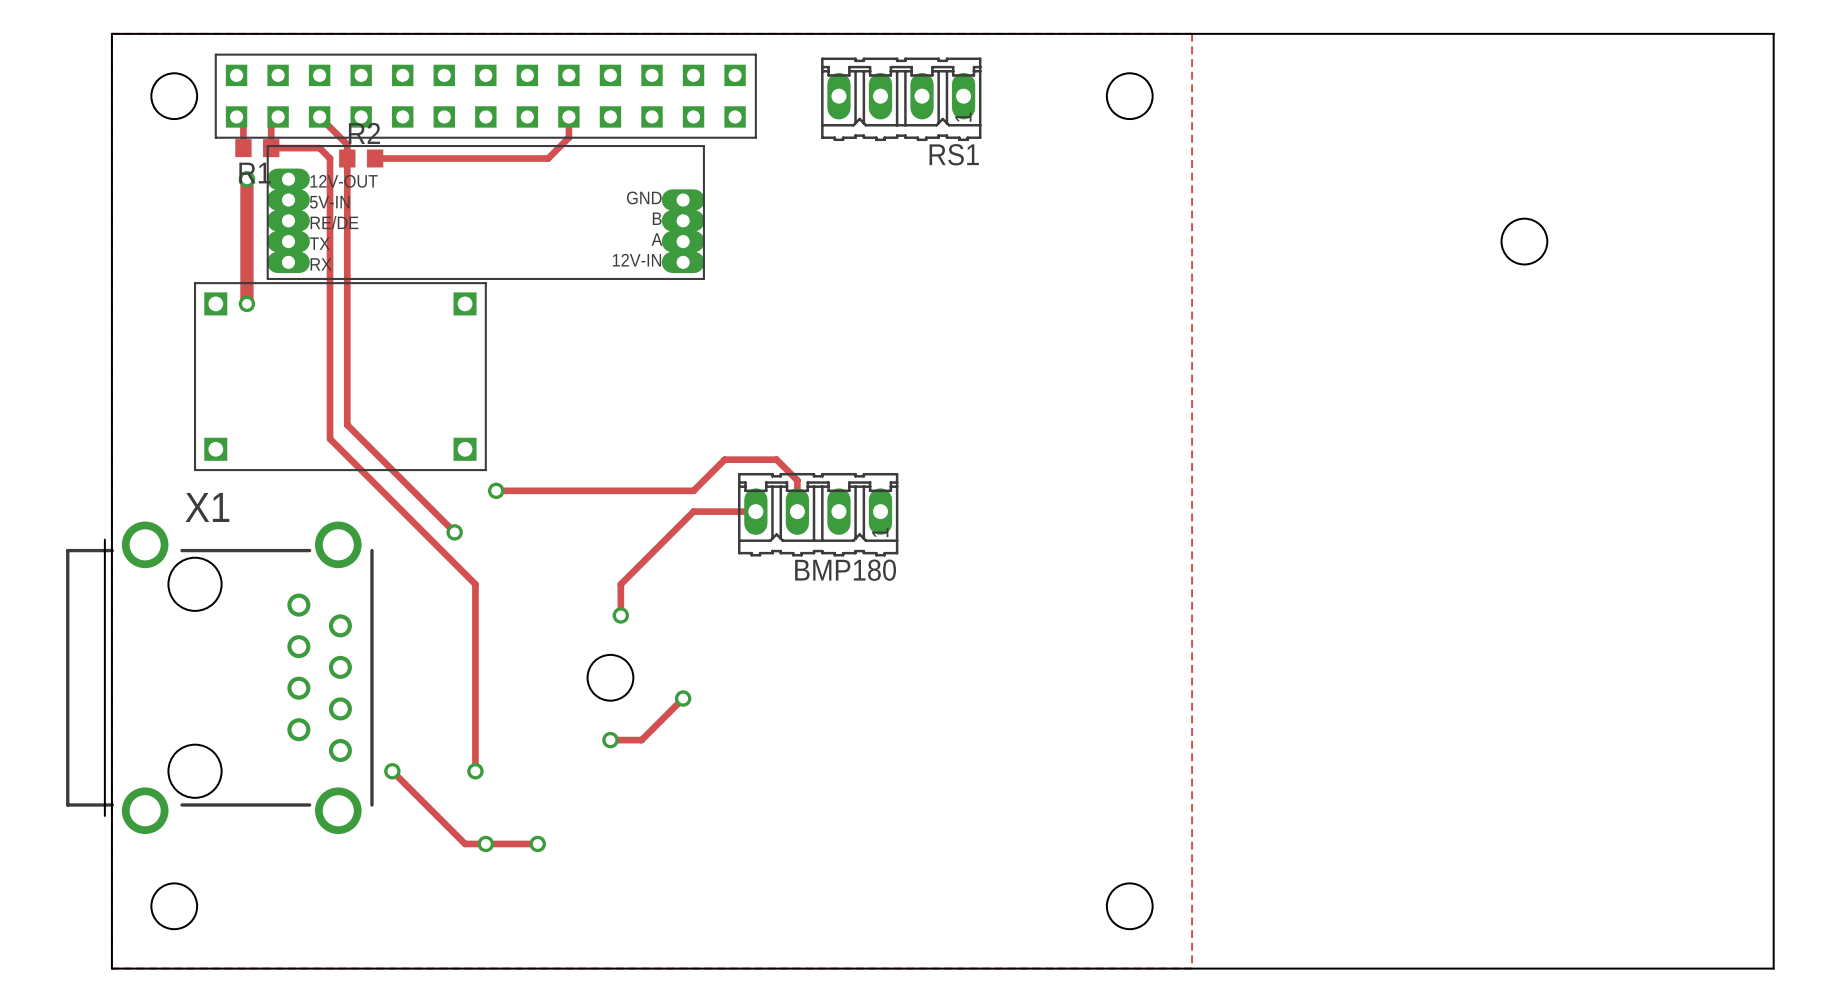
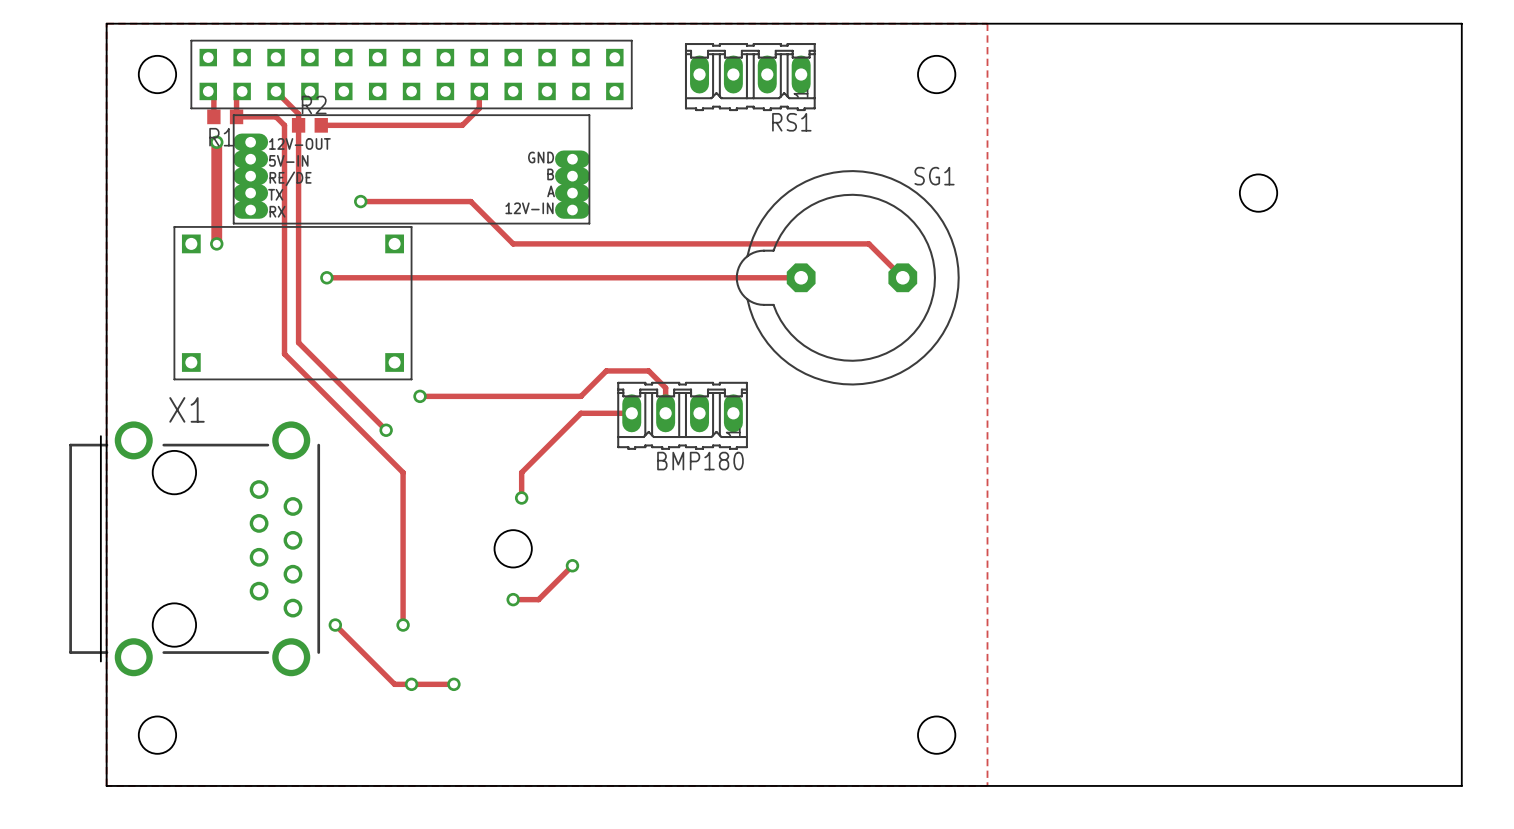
track: none -> (360, 201) (470, 201) (513, 243) (868, 243) (902, 277)
via: none -> (360, 201)
track: none -> (326, 277) (801, 277)
via: none -> (326, 277)
SG1: none -> (847, 277)

